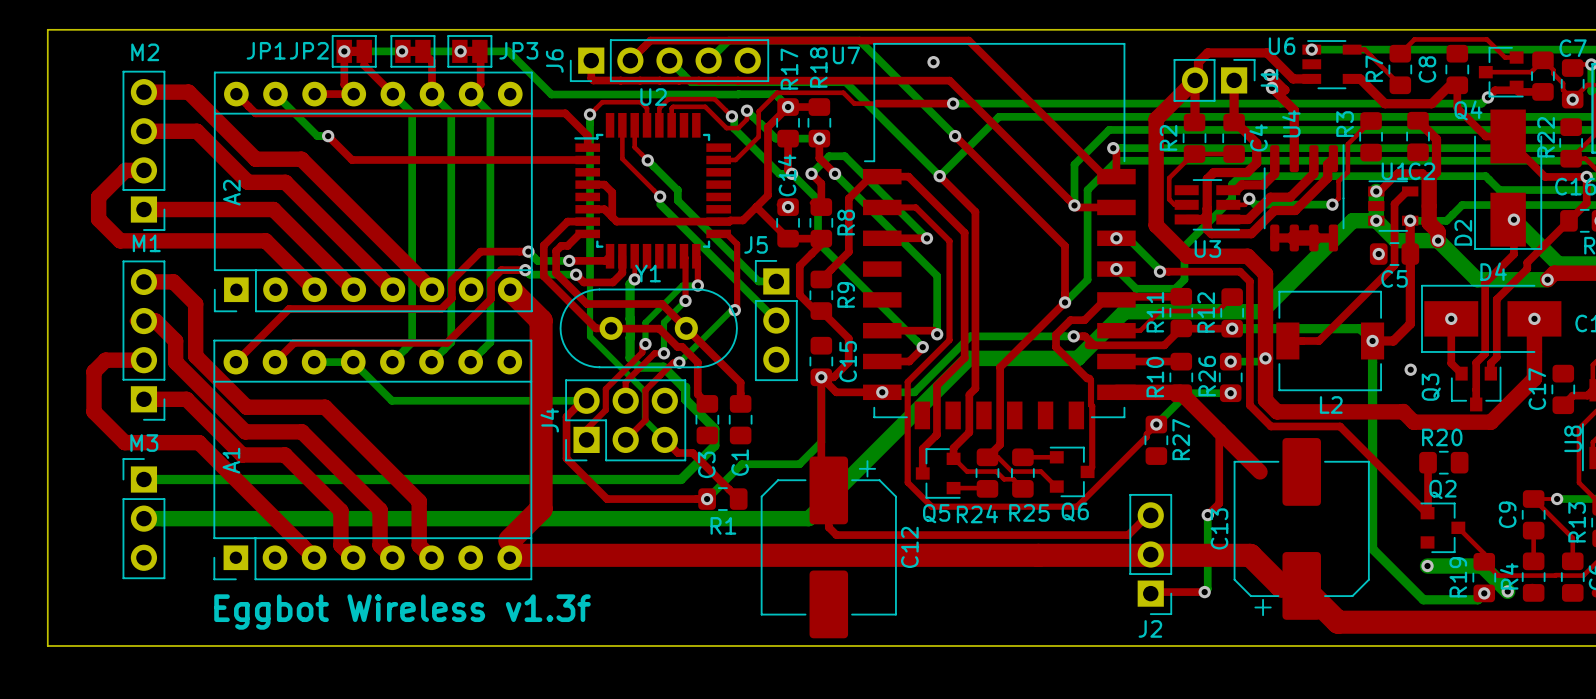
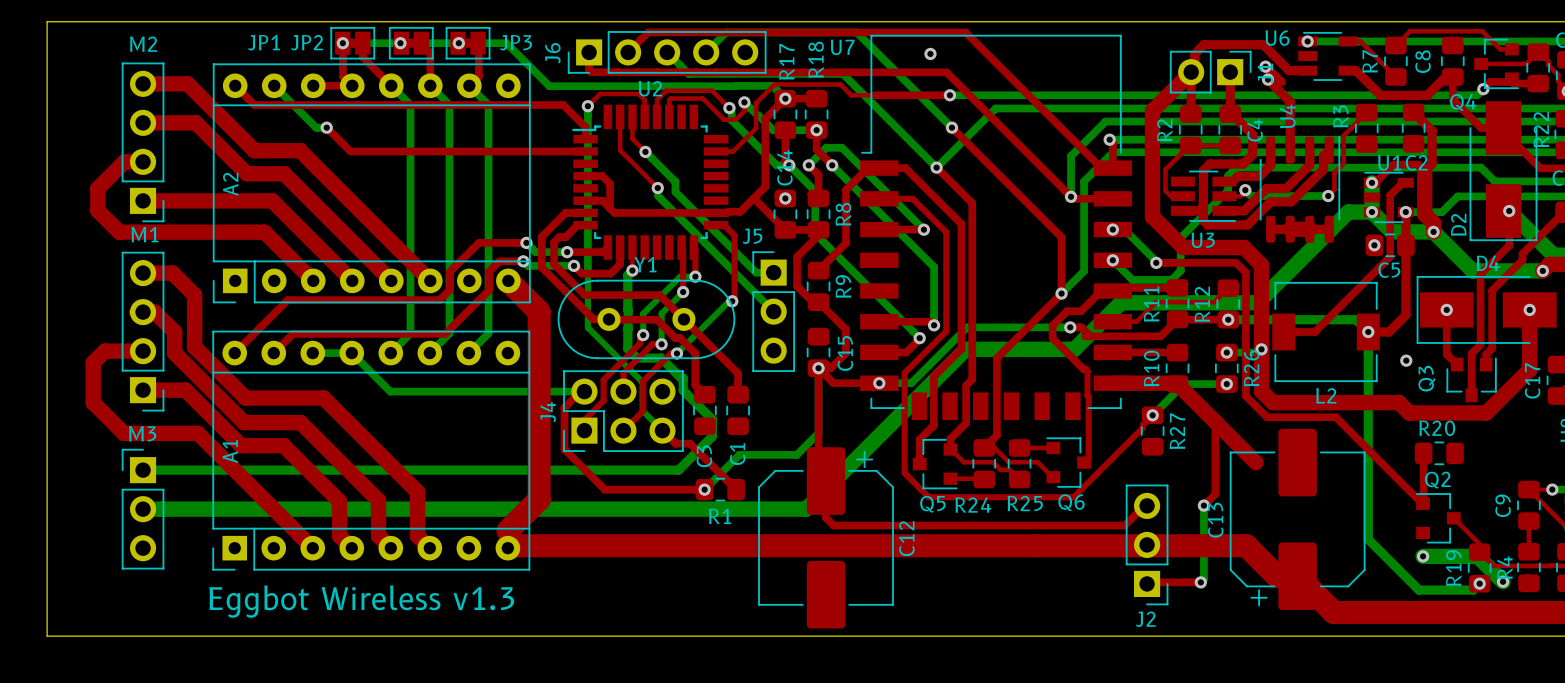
R26 name position: R26 (1207, 376) -> R26 (1251, 368)
text: Eggbot Wireless v1.3f (402, 612) -> Eggbot Wireless v1.3 (361, 601)

